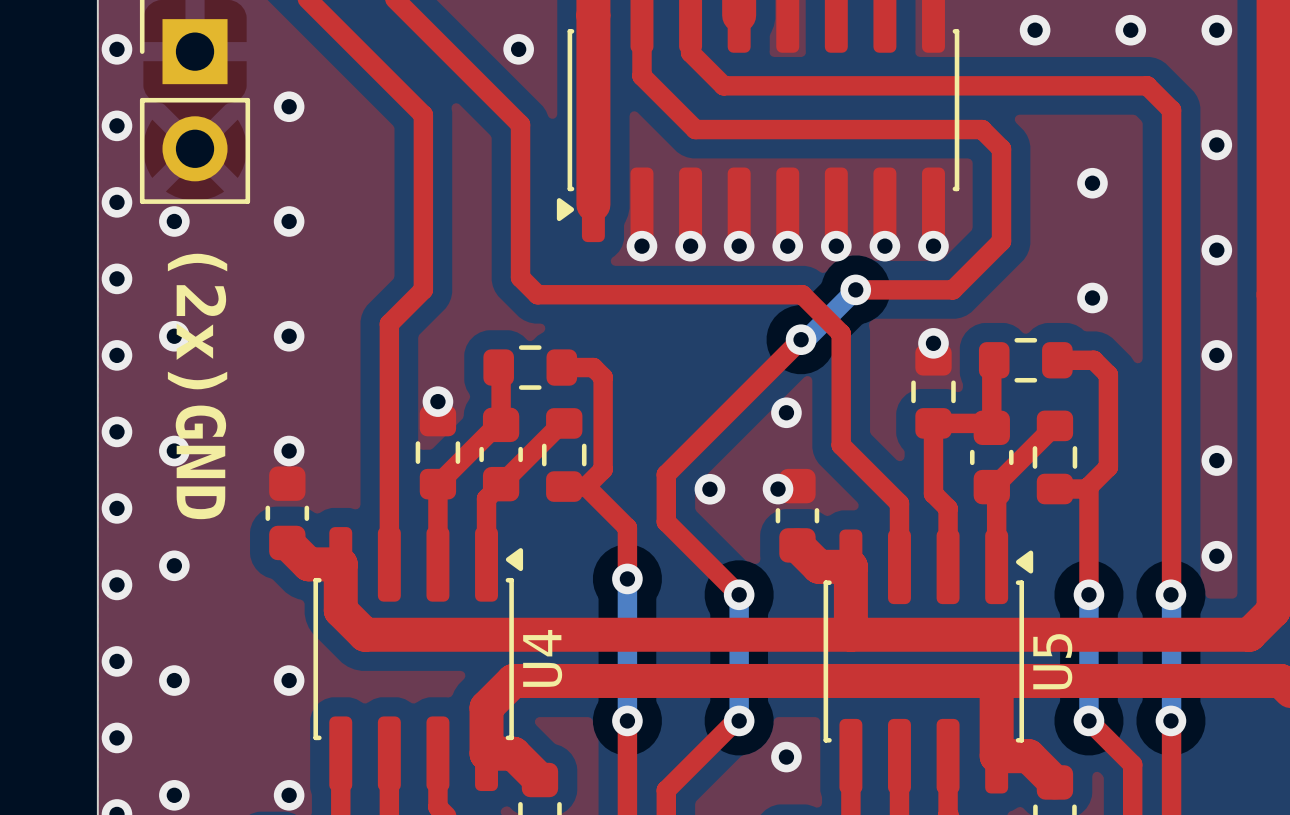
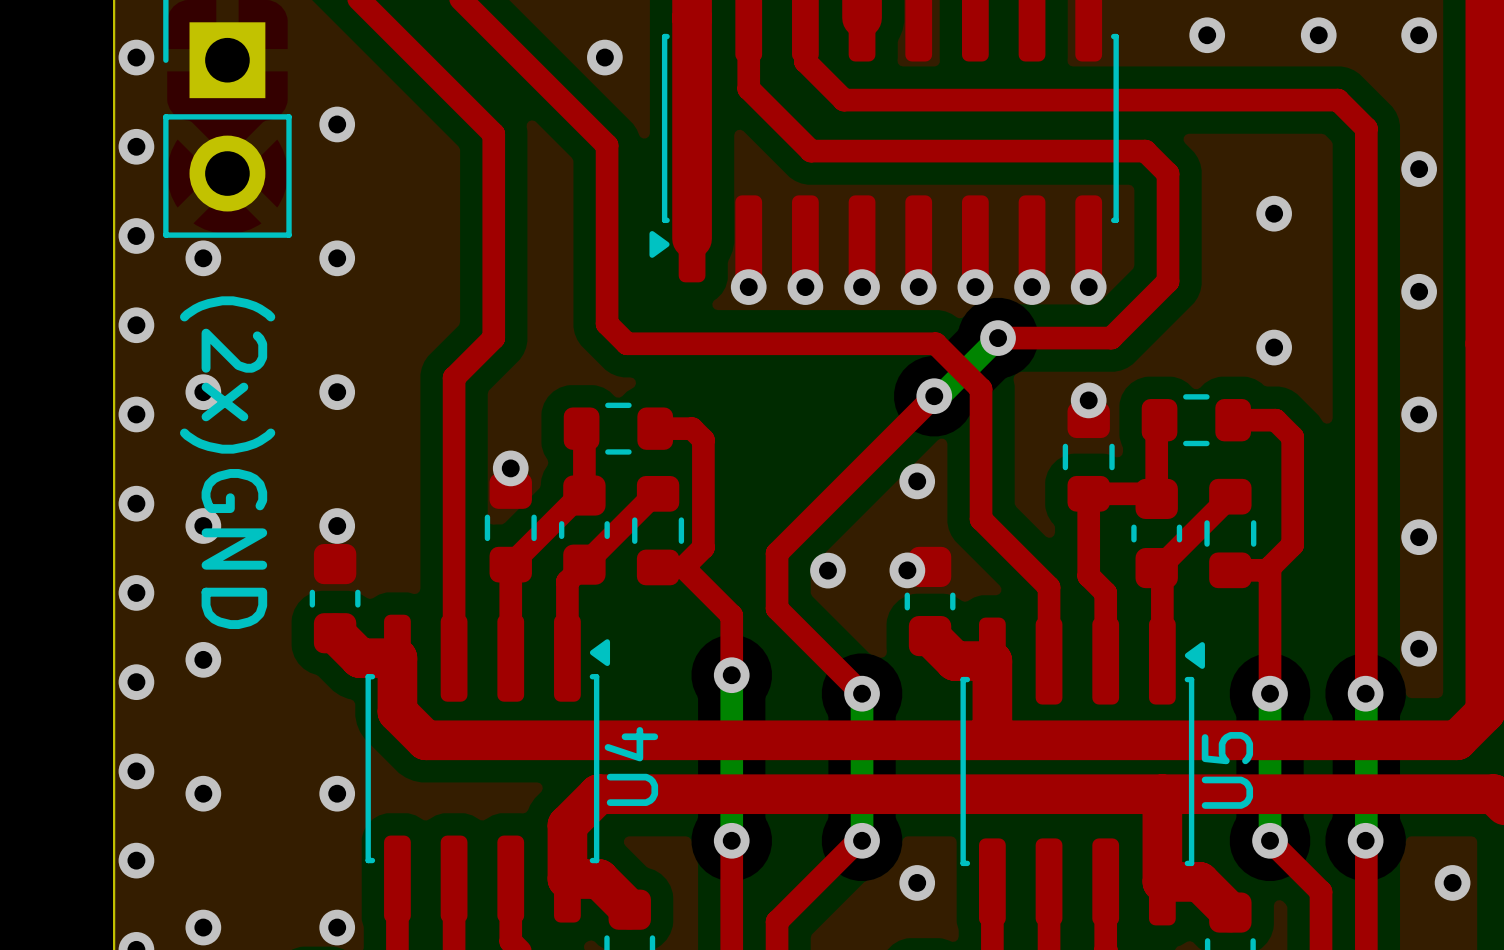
via: none -> (1452, 882)

